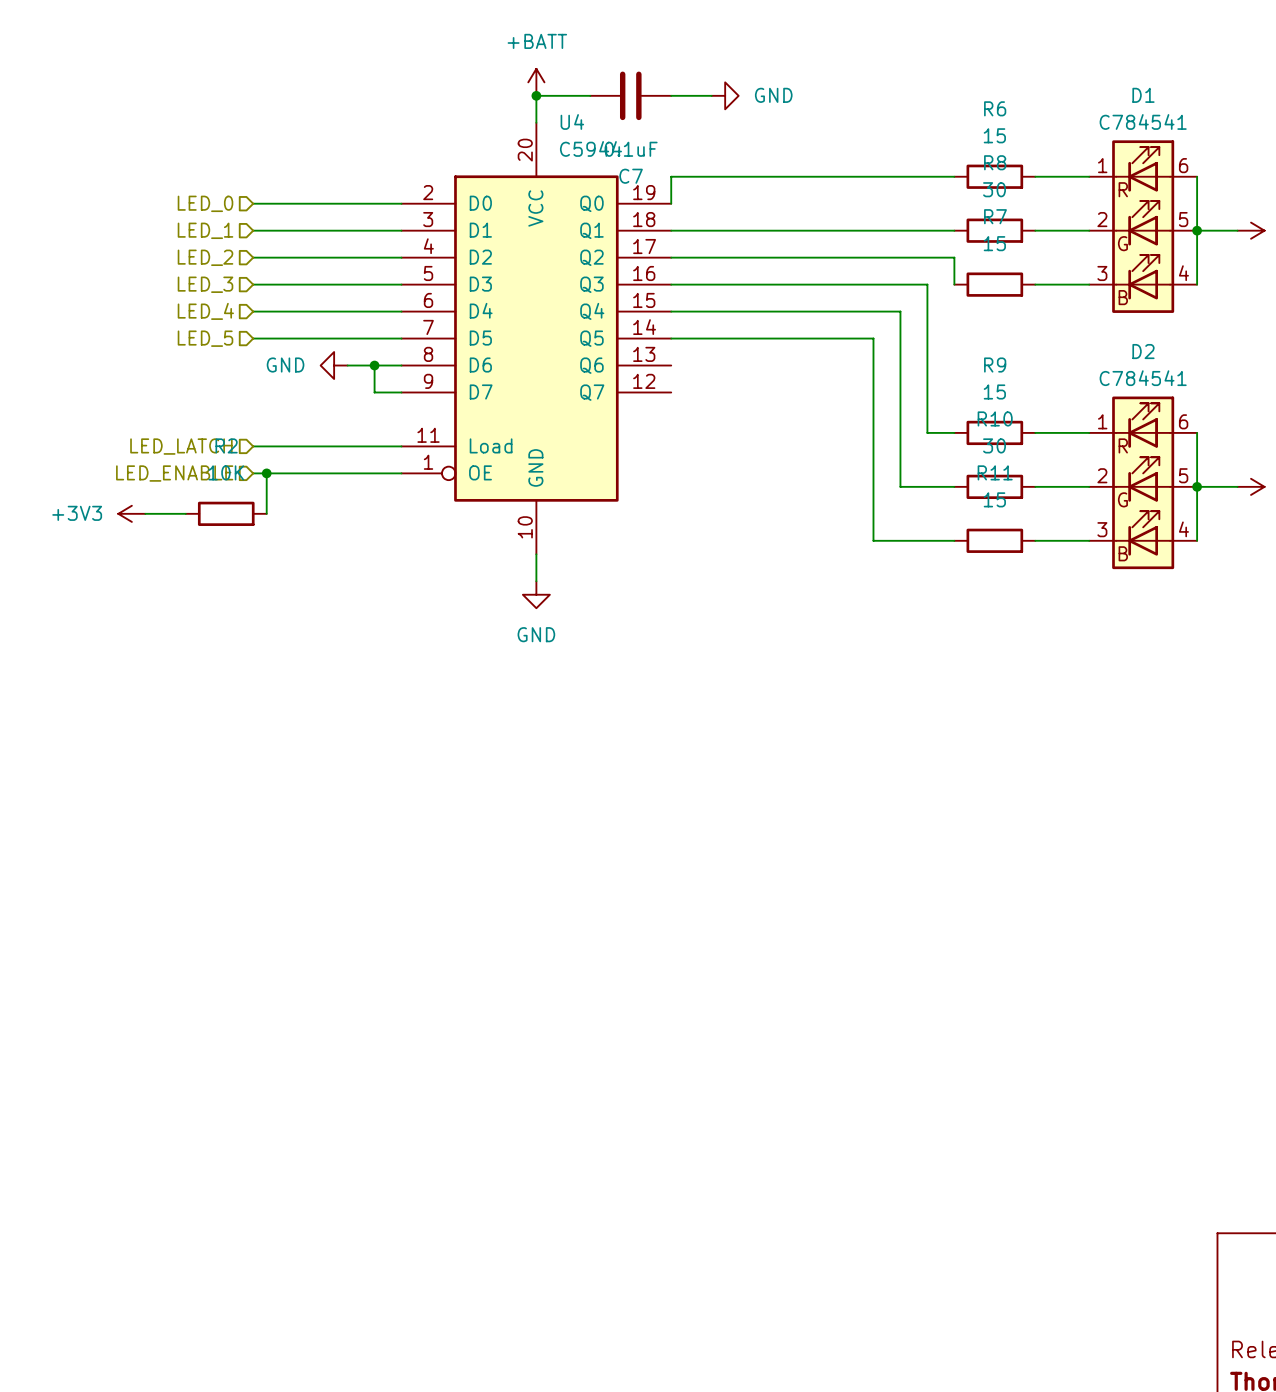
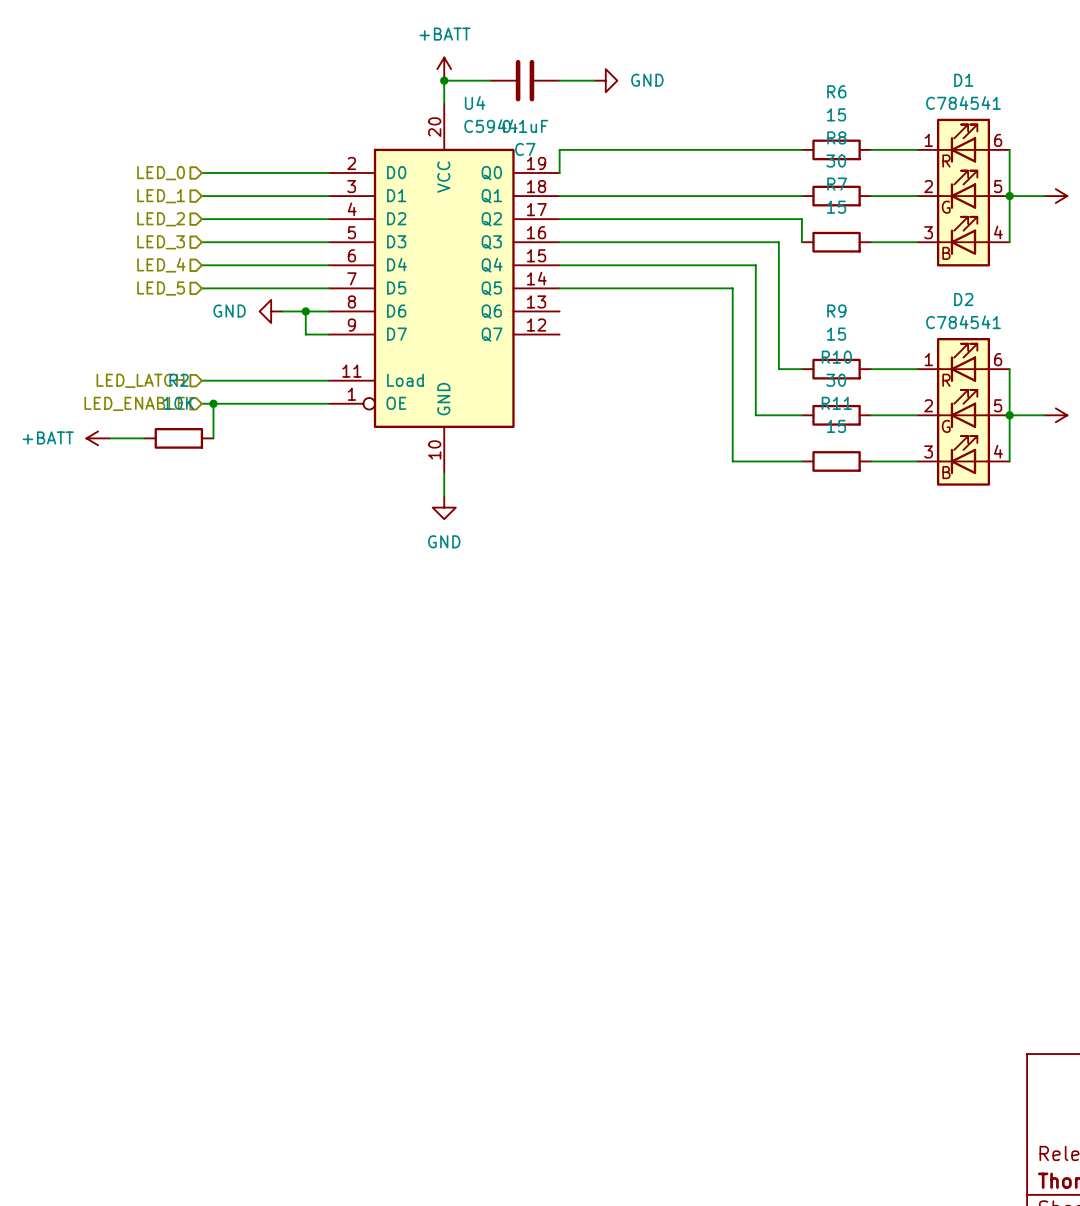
power symbol: +3V3 (131, 513) -> +BATT (98, 438)

